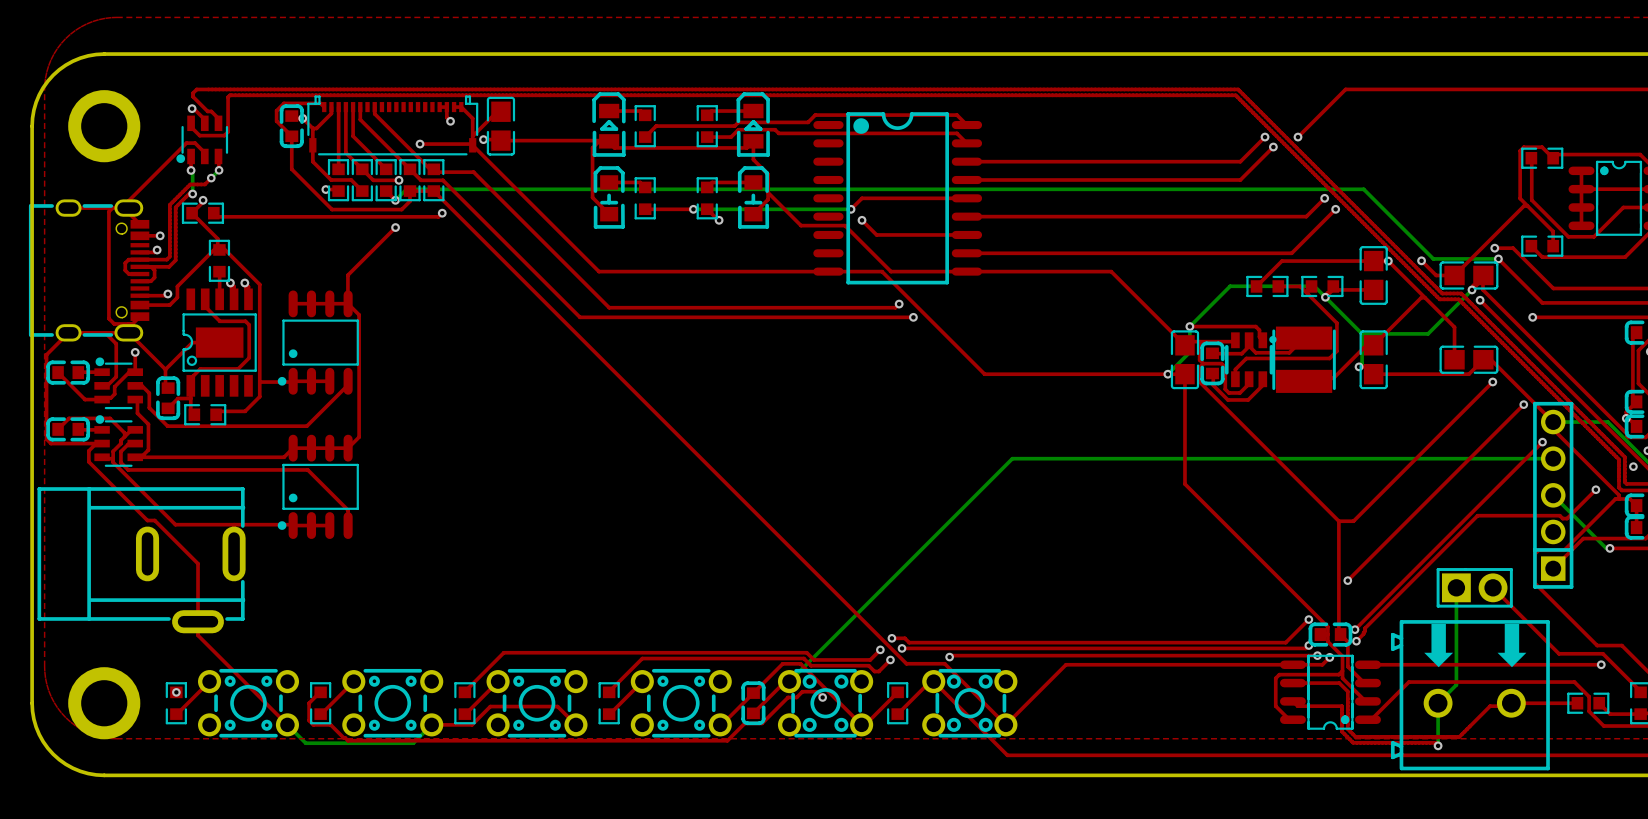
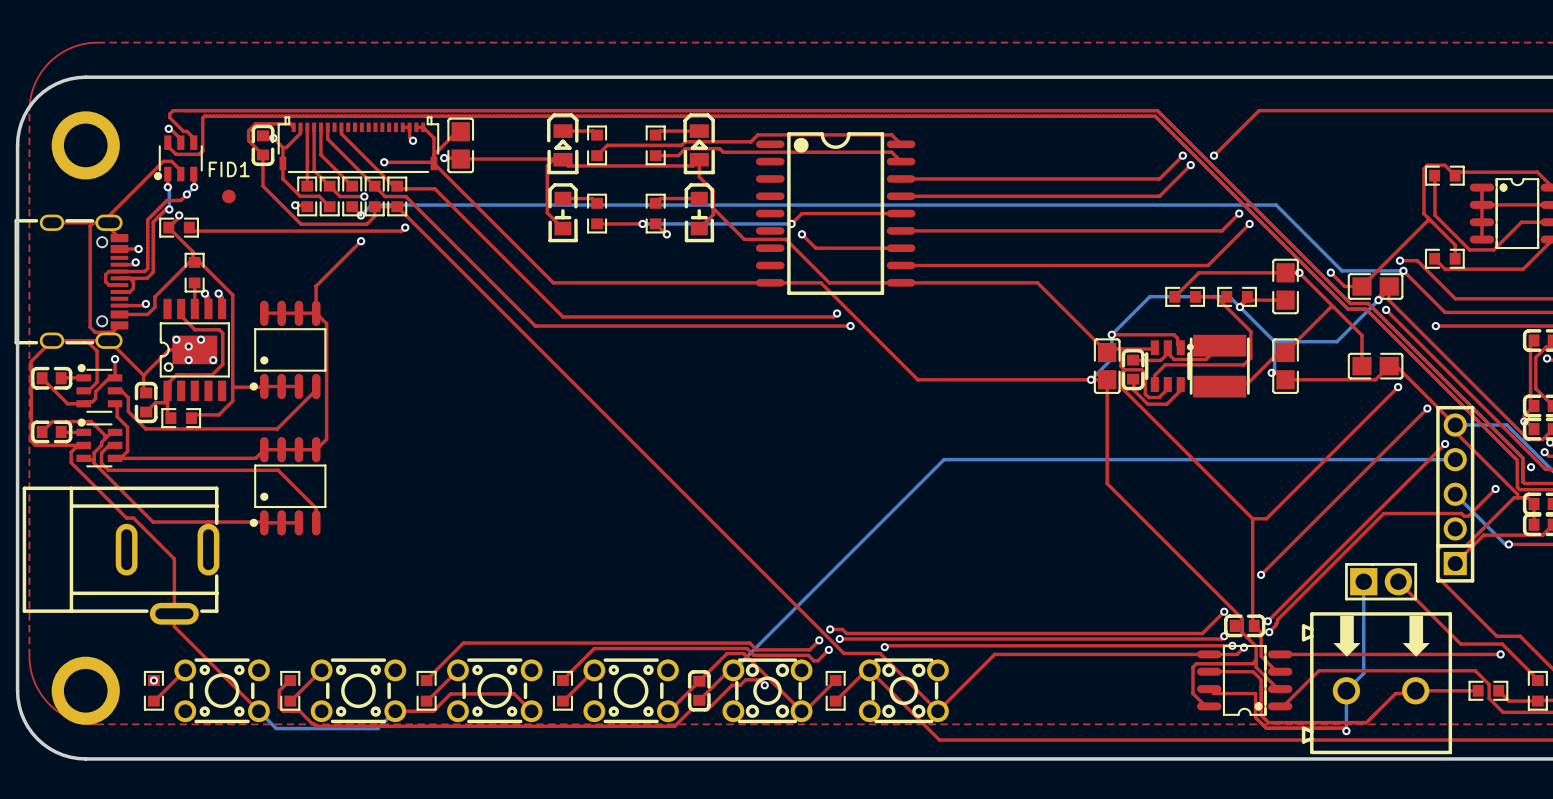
FID1: none -> (228, 196)
via: none -> (176, 339)
via: none -> (200, 339)
via: none -> (188, 346)
via: none -> (188, 360)
via: none -> (213, 360)

